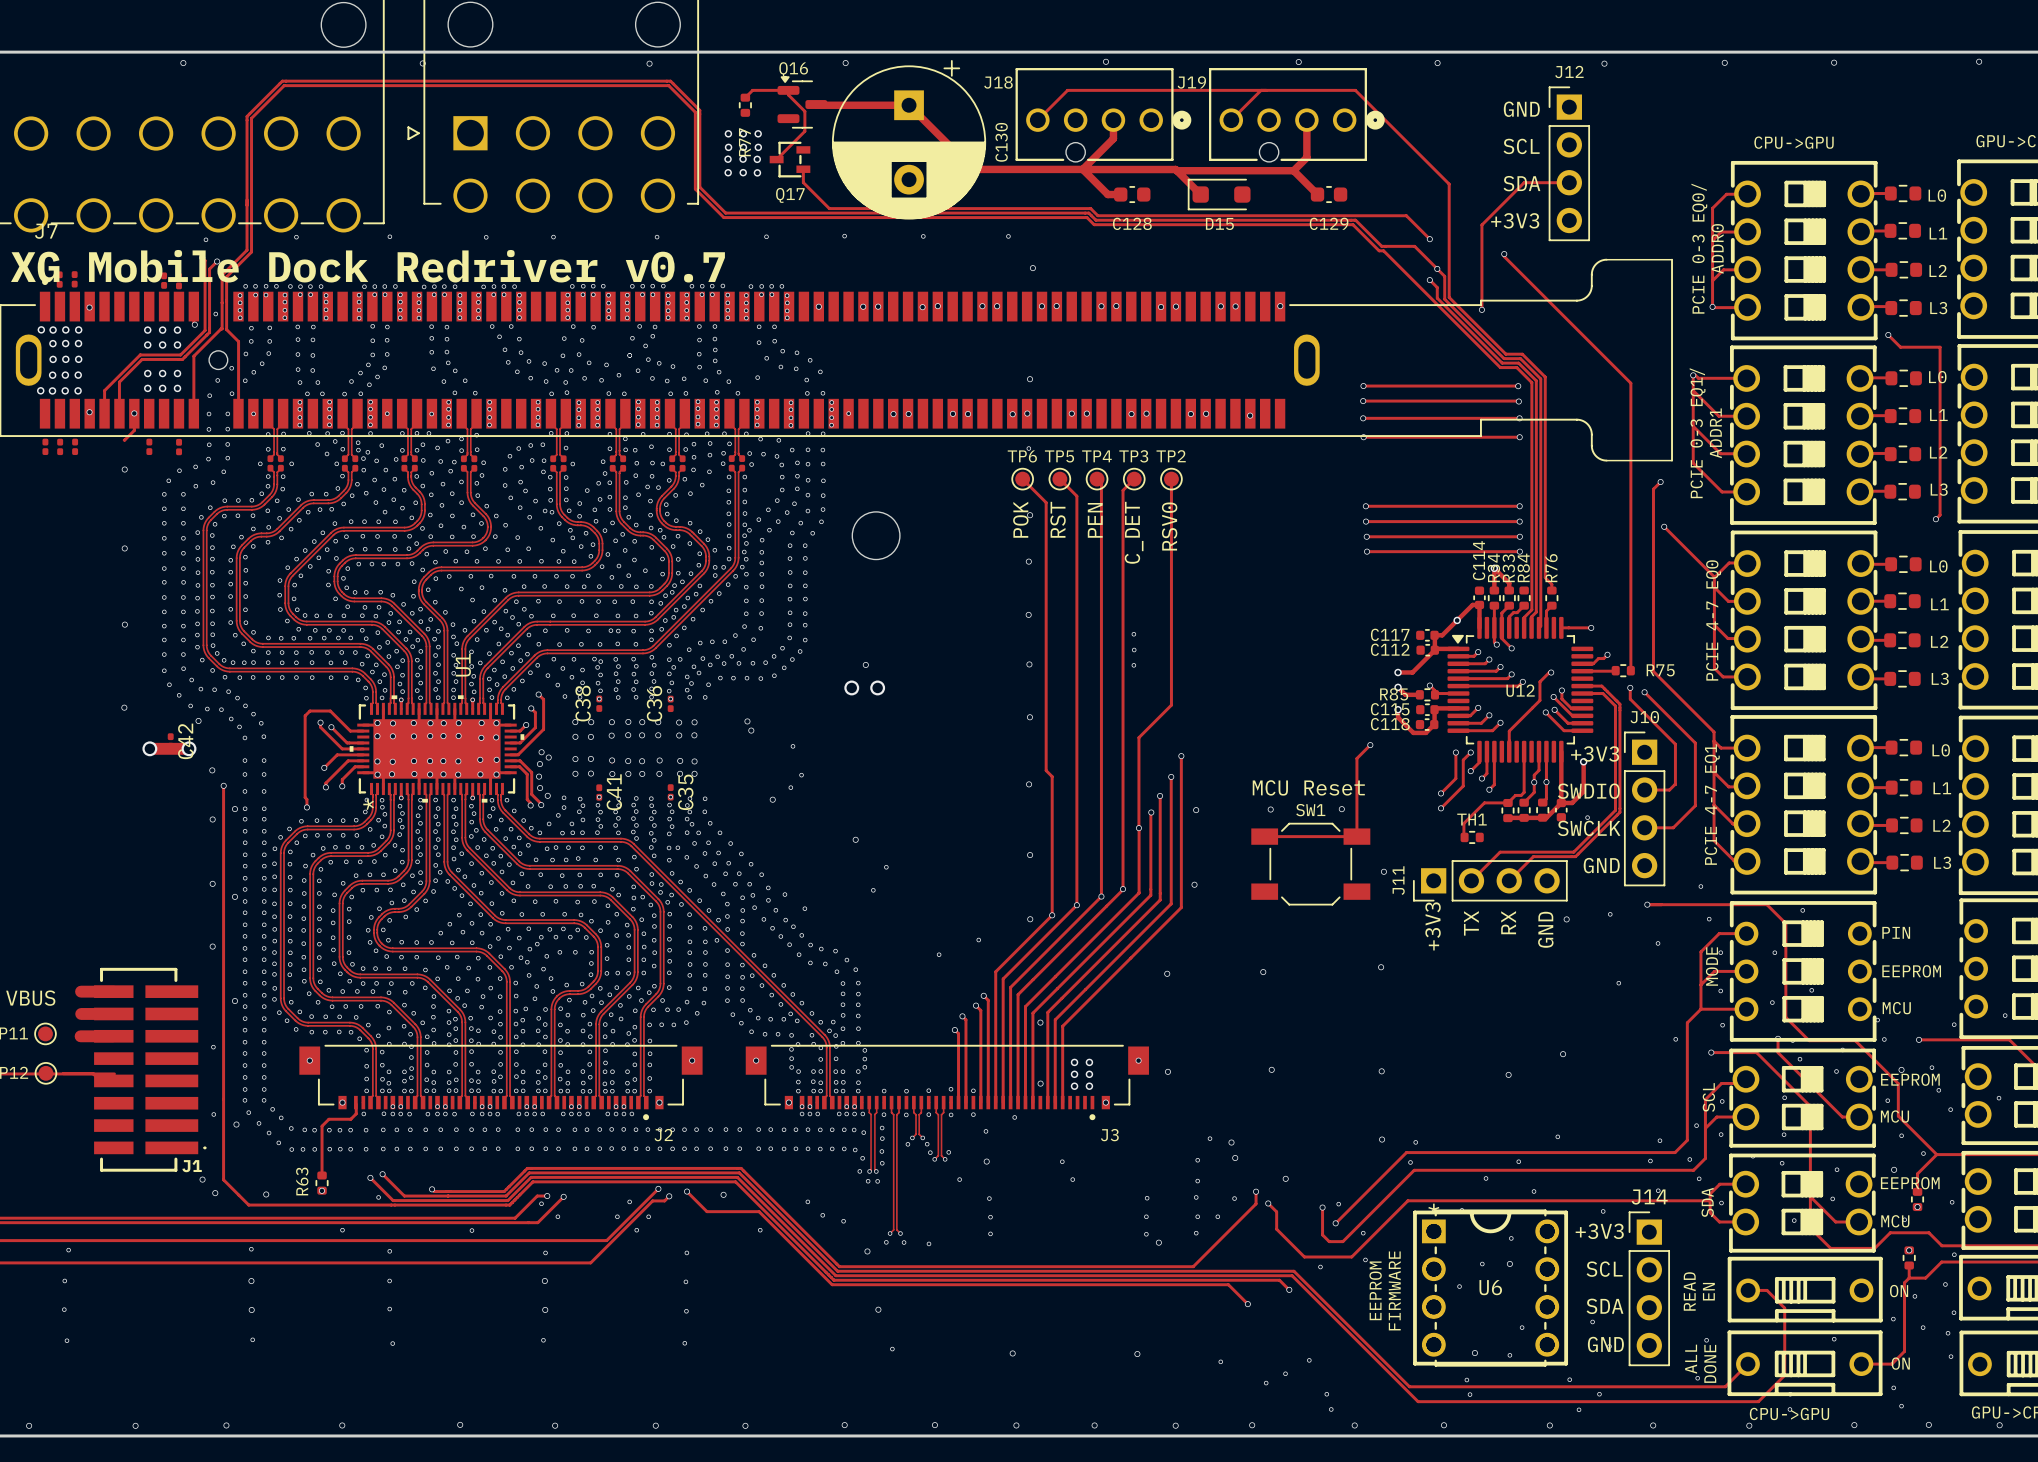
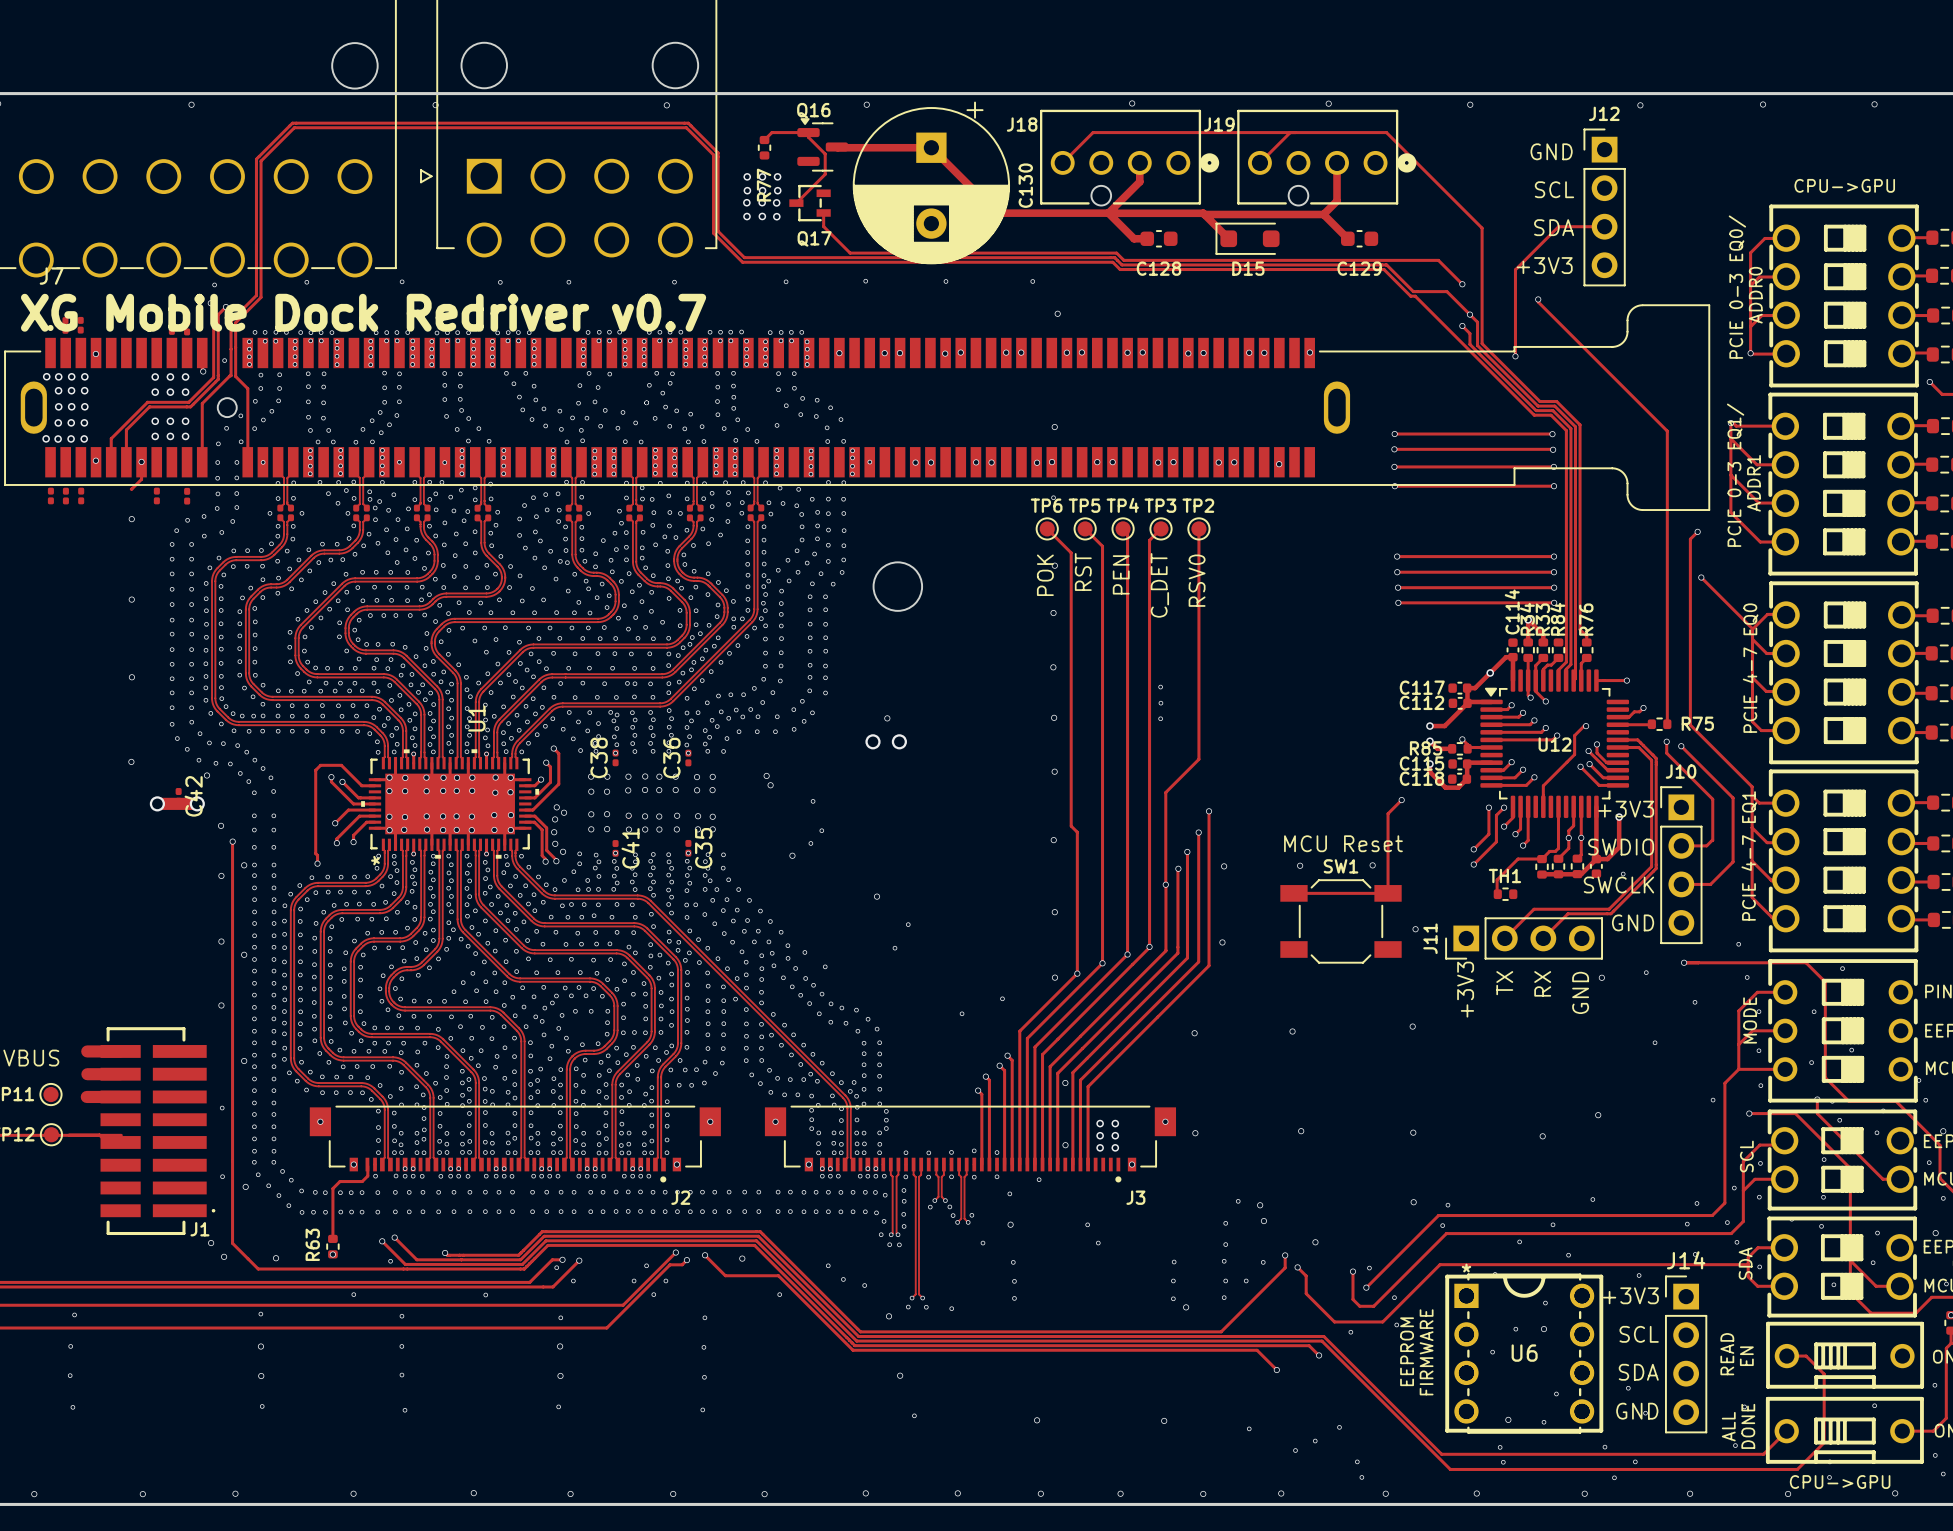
via: (800, 651) -> none
via: (765, 662) -> none
via: (752, 663) -> none
via: none -> (777, 716)
via: (733, 678) -> none
via: none -> (757, 731)
via: (747, 678) -> none
via: none -> (775, 731)
via: (760, 678) -> none

